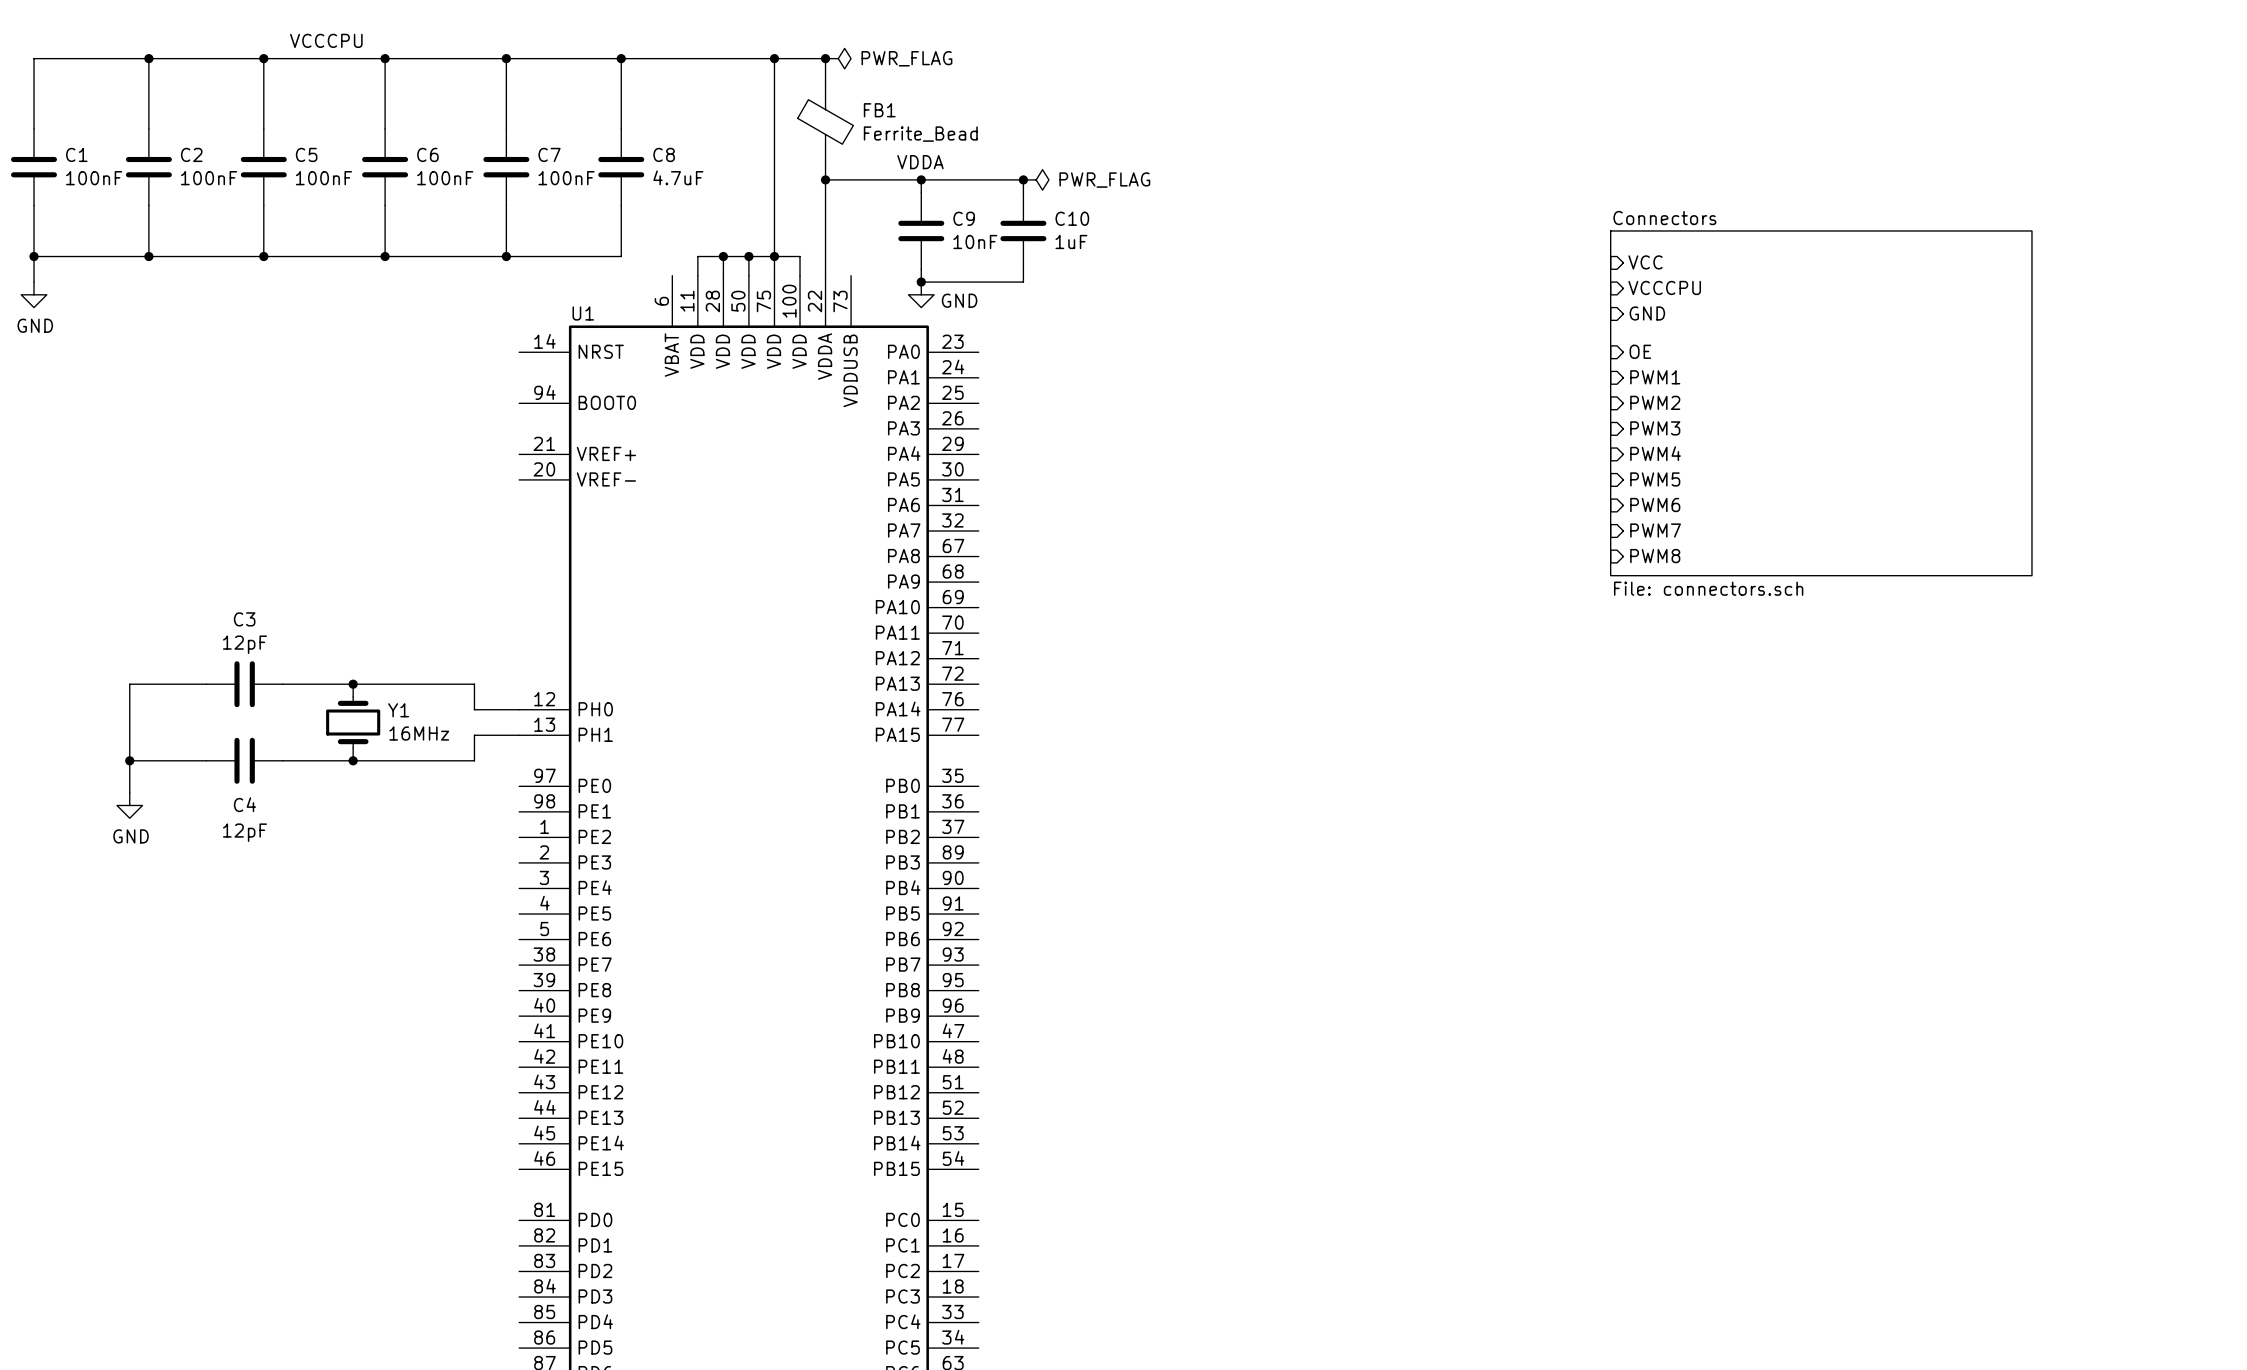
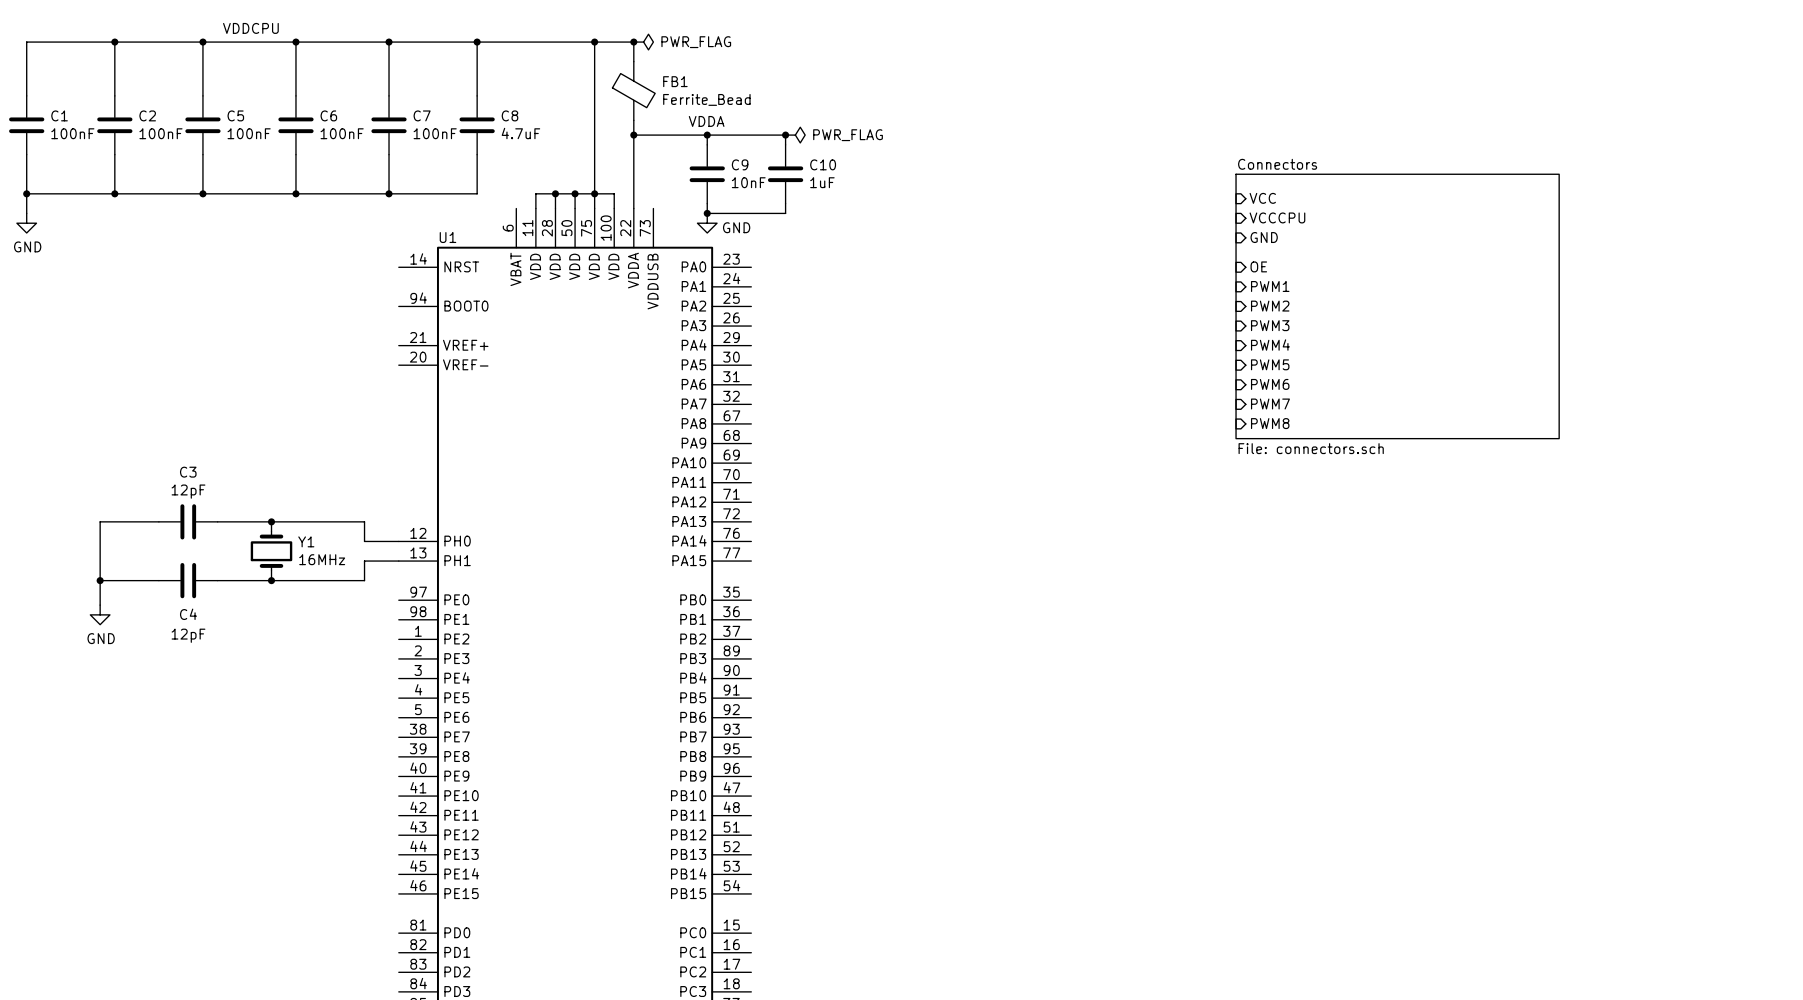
label: VCCCPU (326, 40) -> VDDCPU (250, 28)

